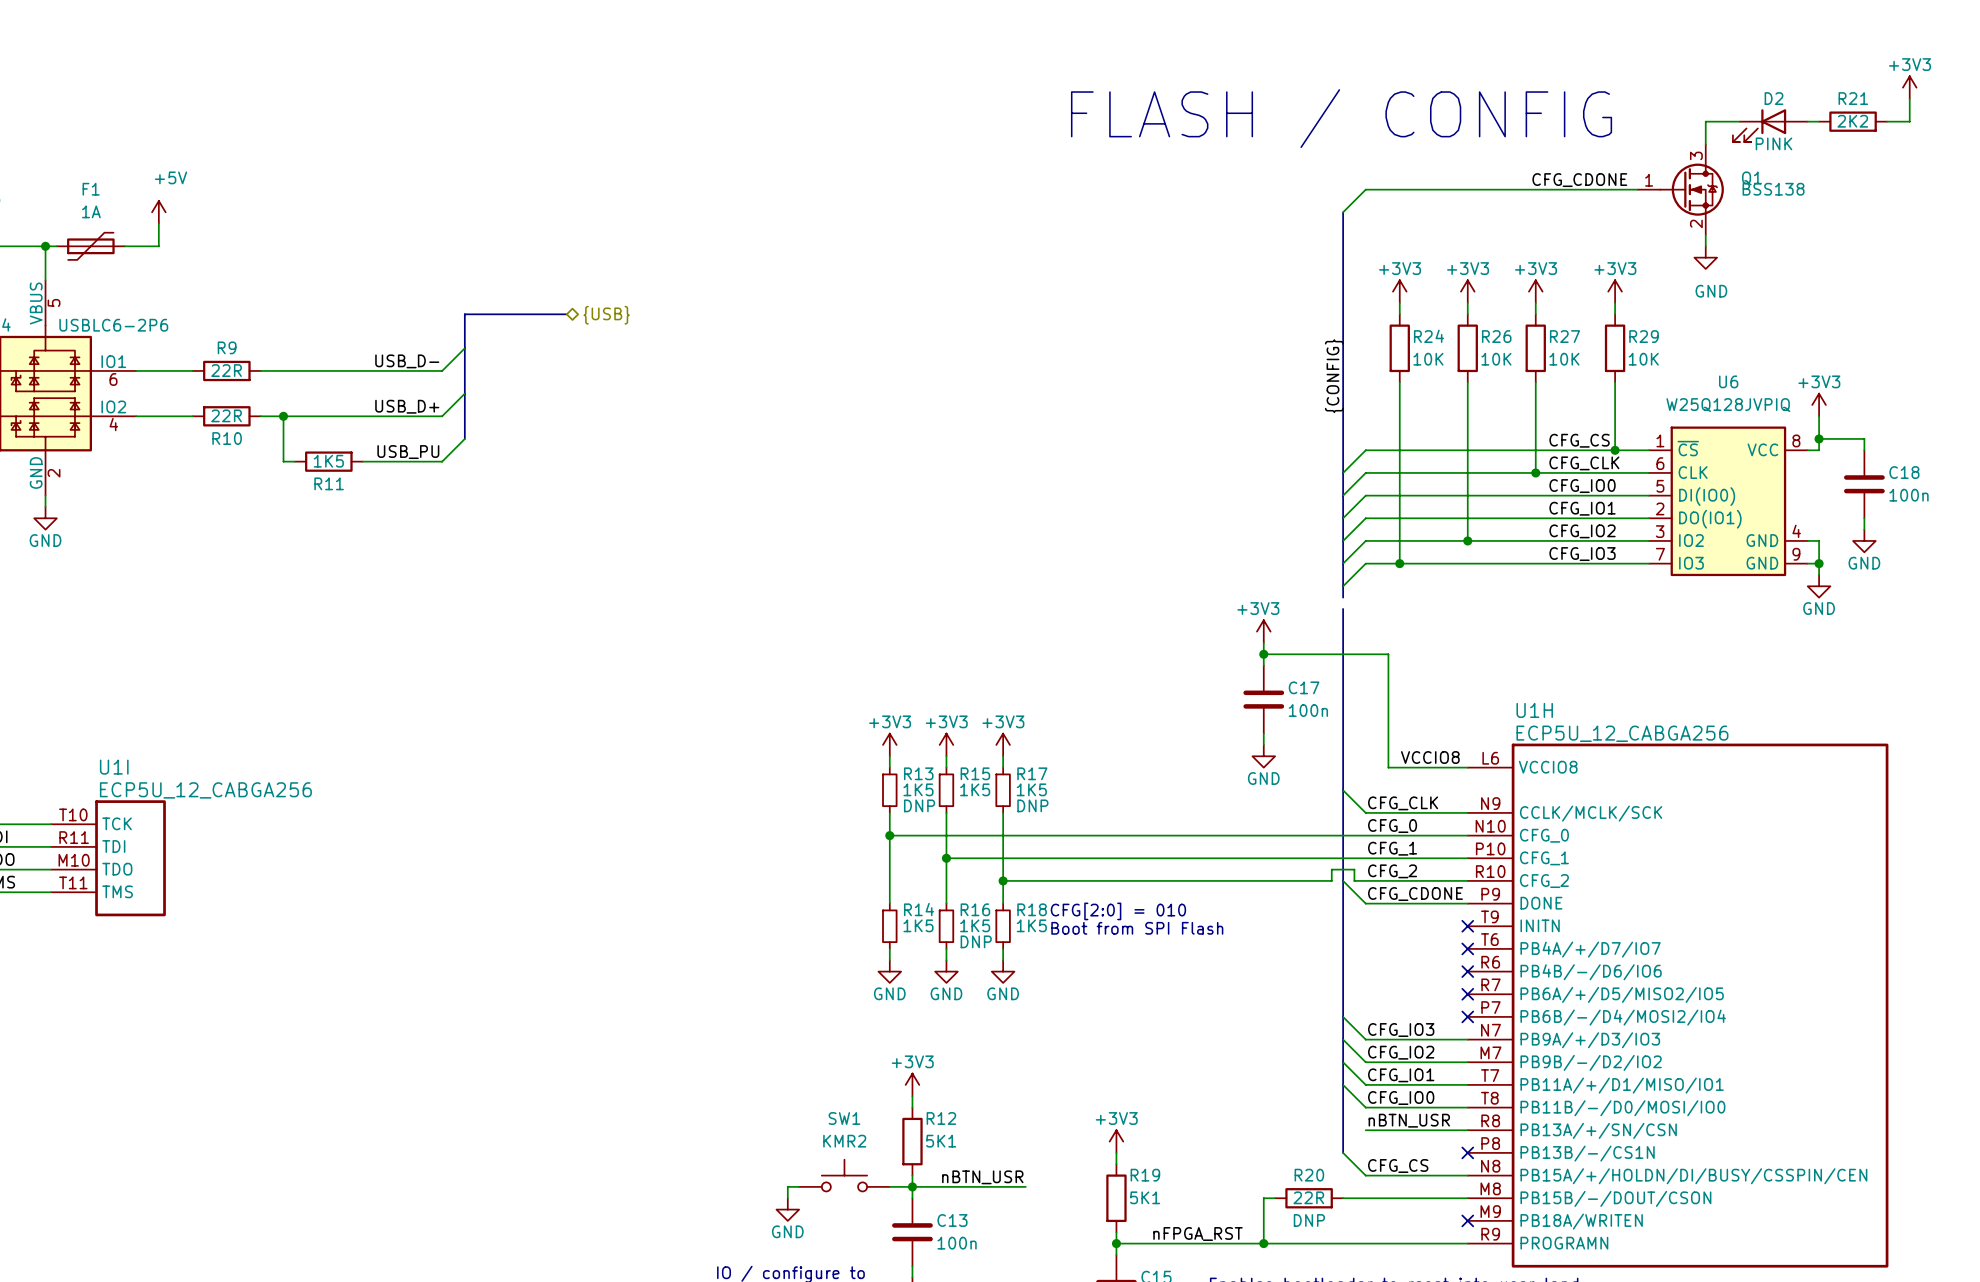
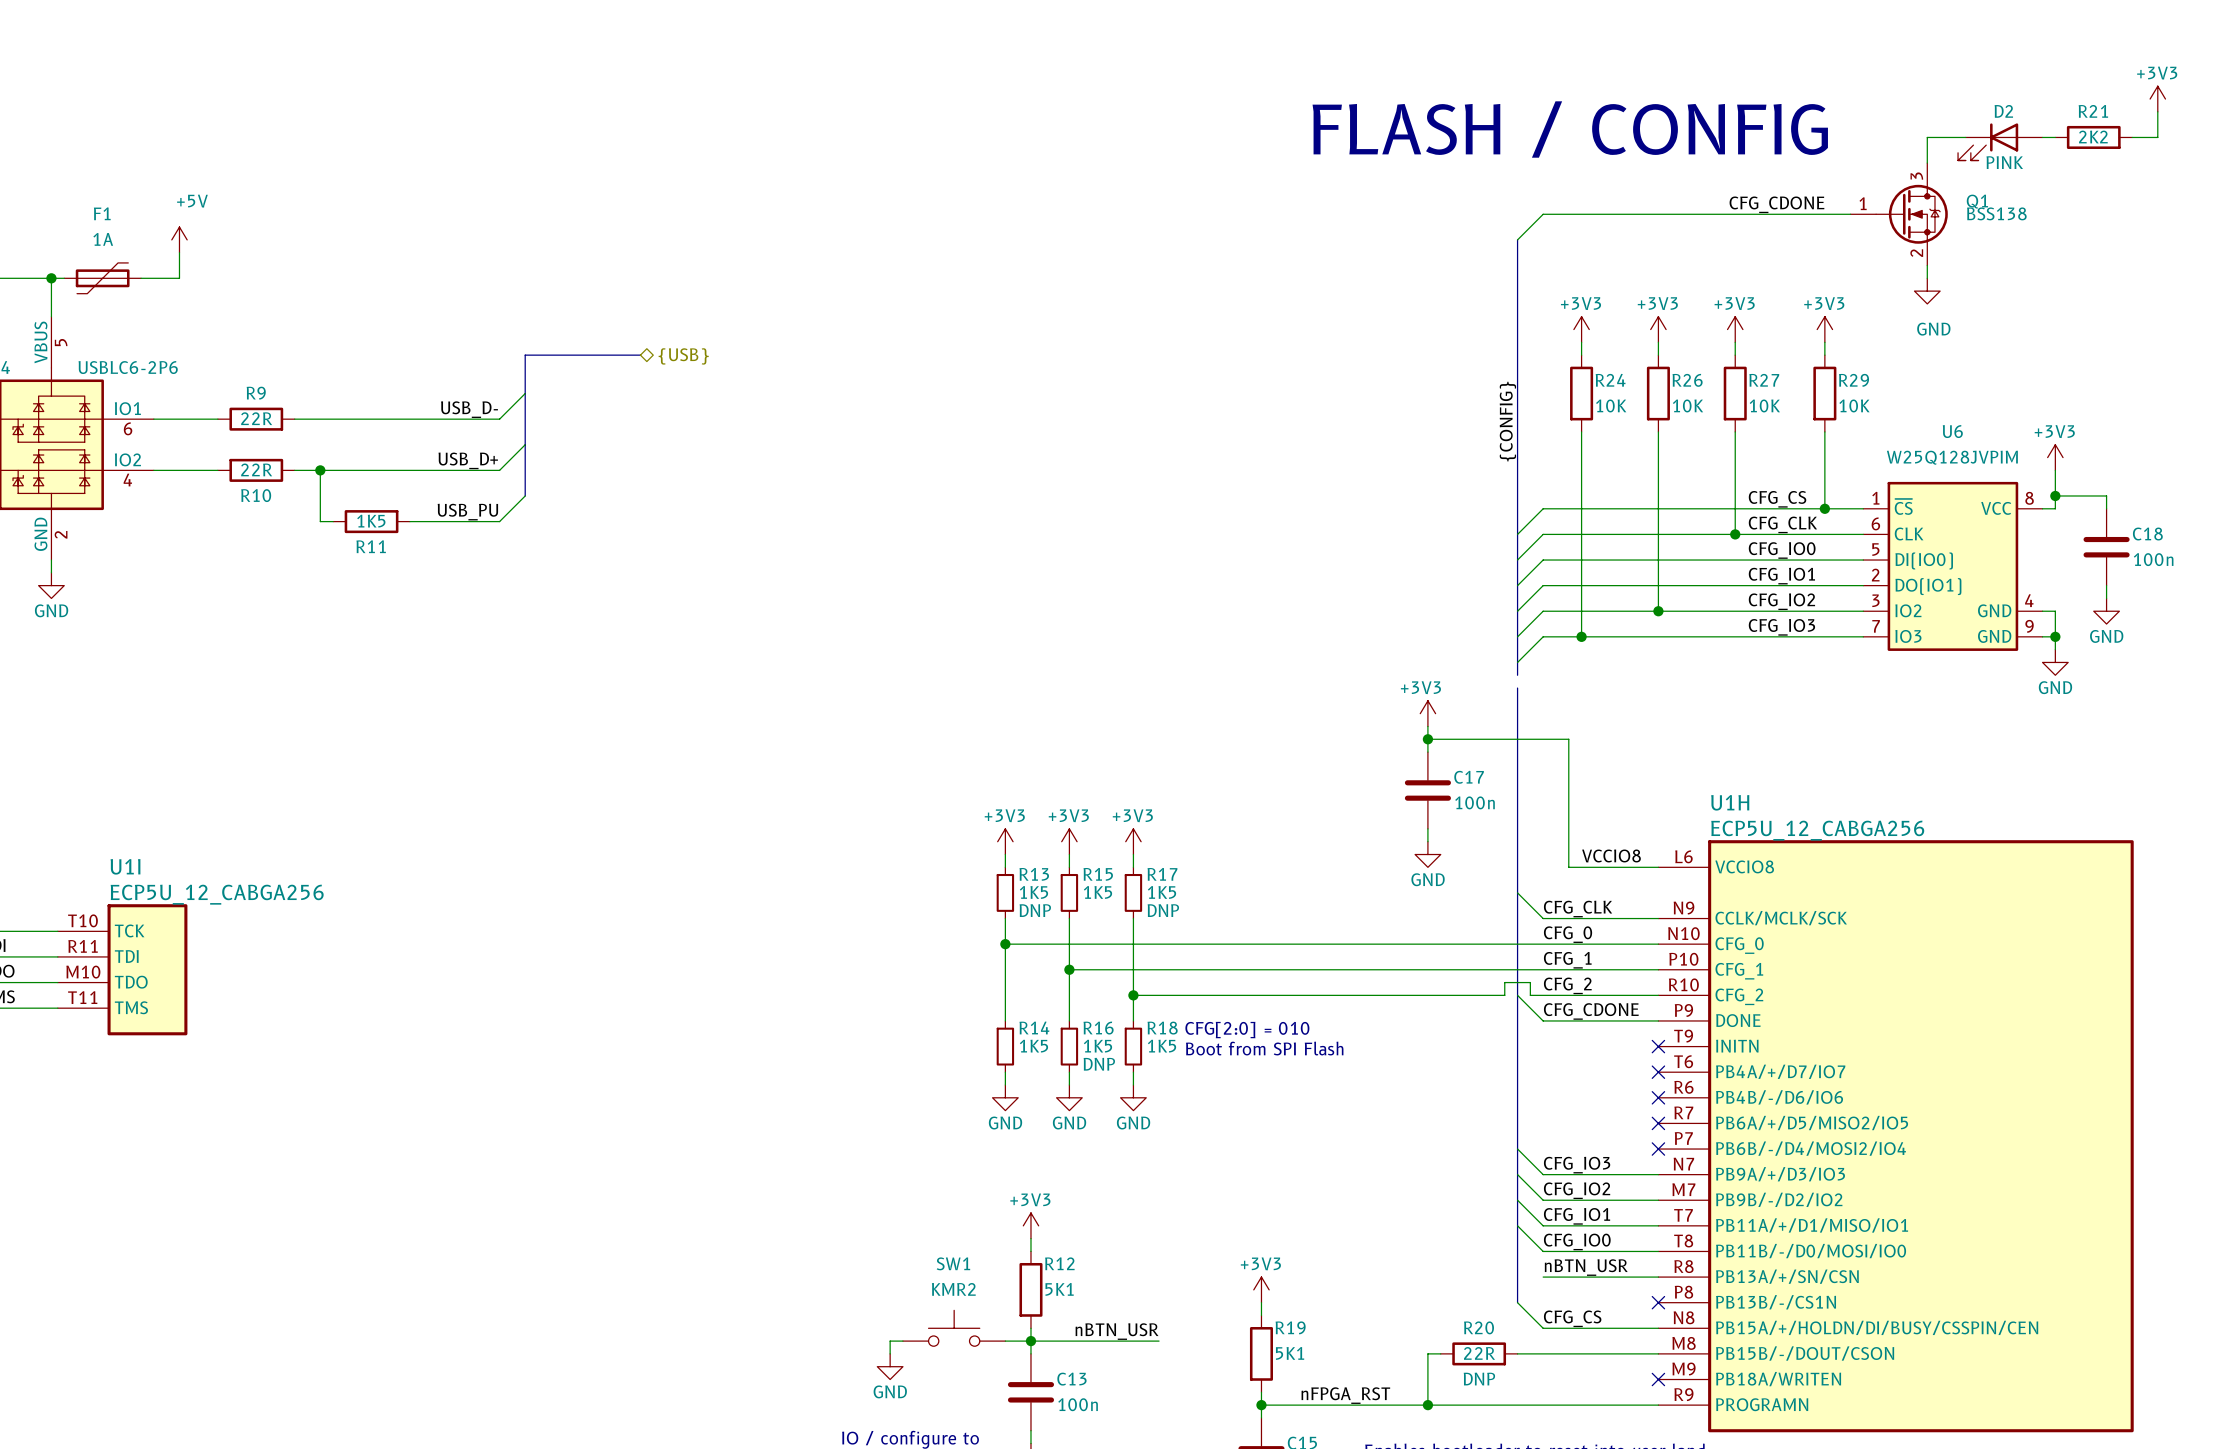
U6 value: W25Q128JVPIQ (1728, 405) -> W25Q128JVPIM (1952, 457)
U1H symbol: [1467, 743, 1889, 1268] -> [1658, 840, 2134, 1433]
U1I symbol: [51, 800, 166, 917] -> [57, 904, 188, 1036]

